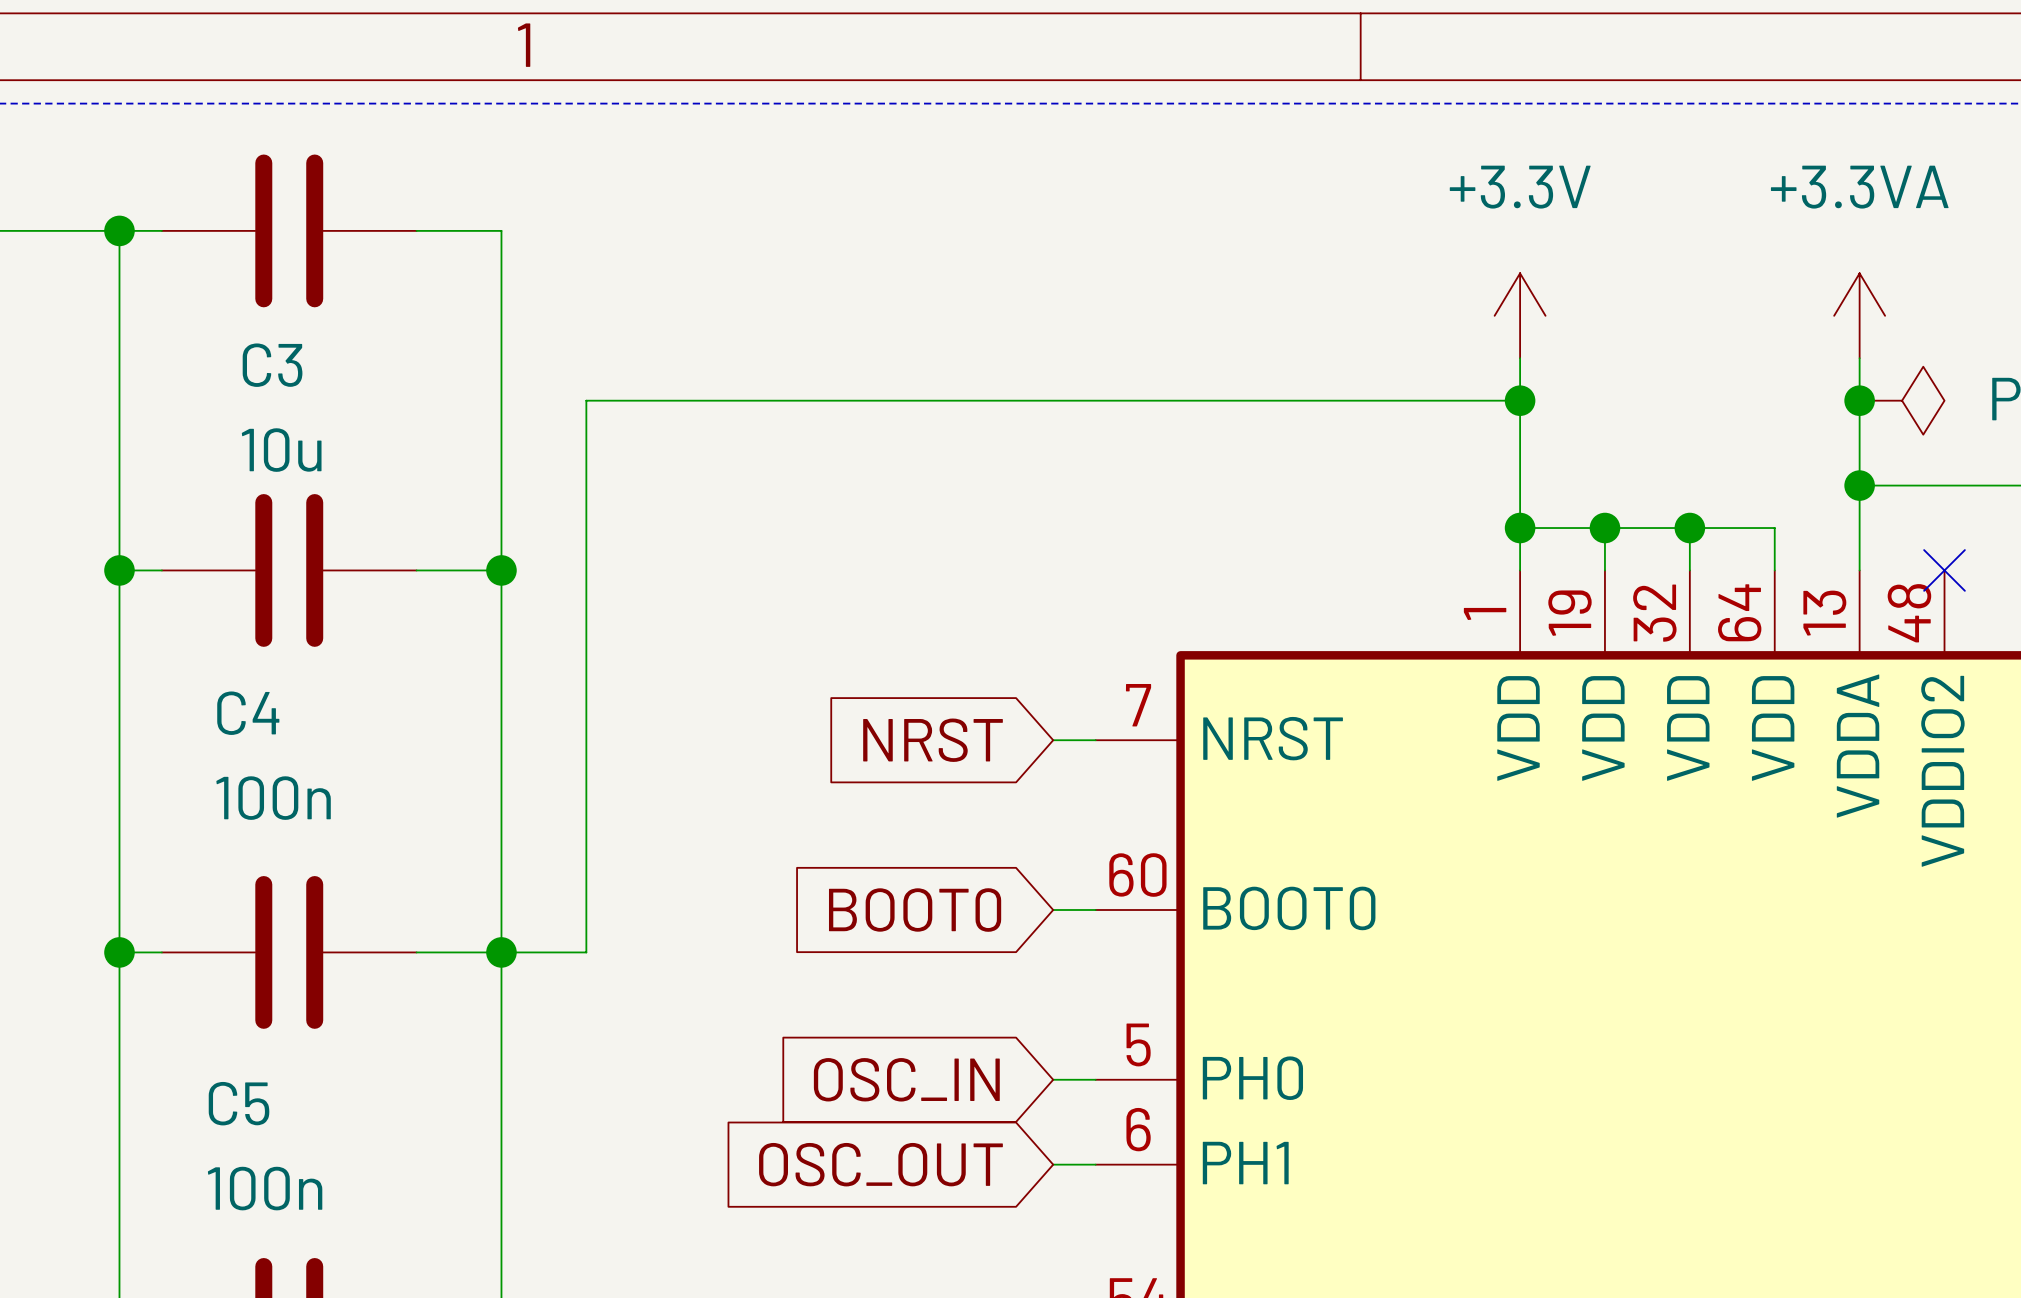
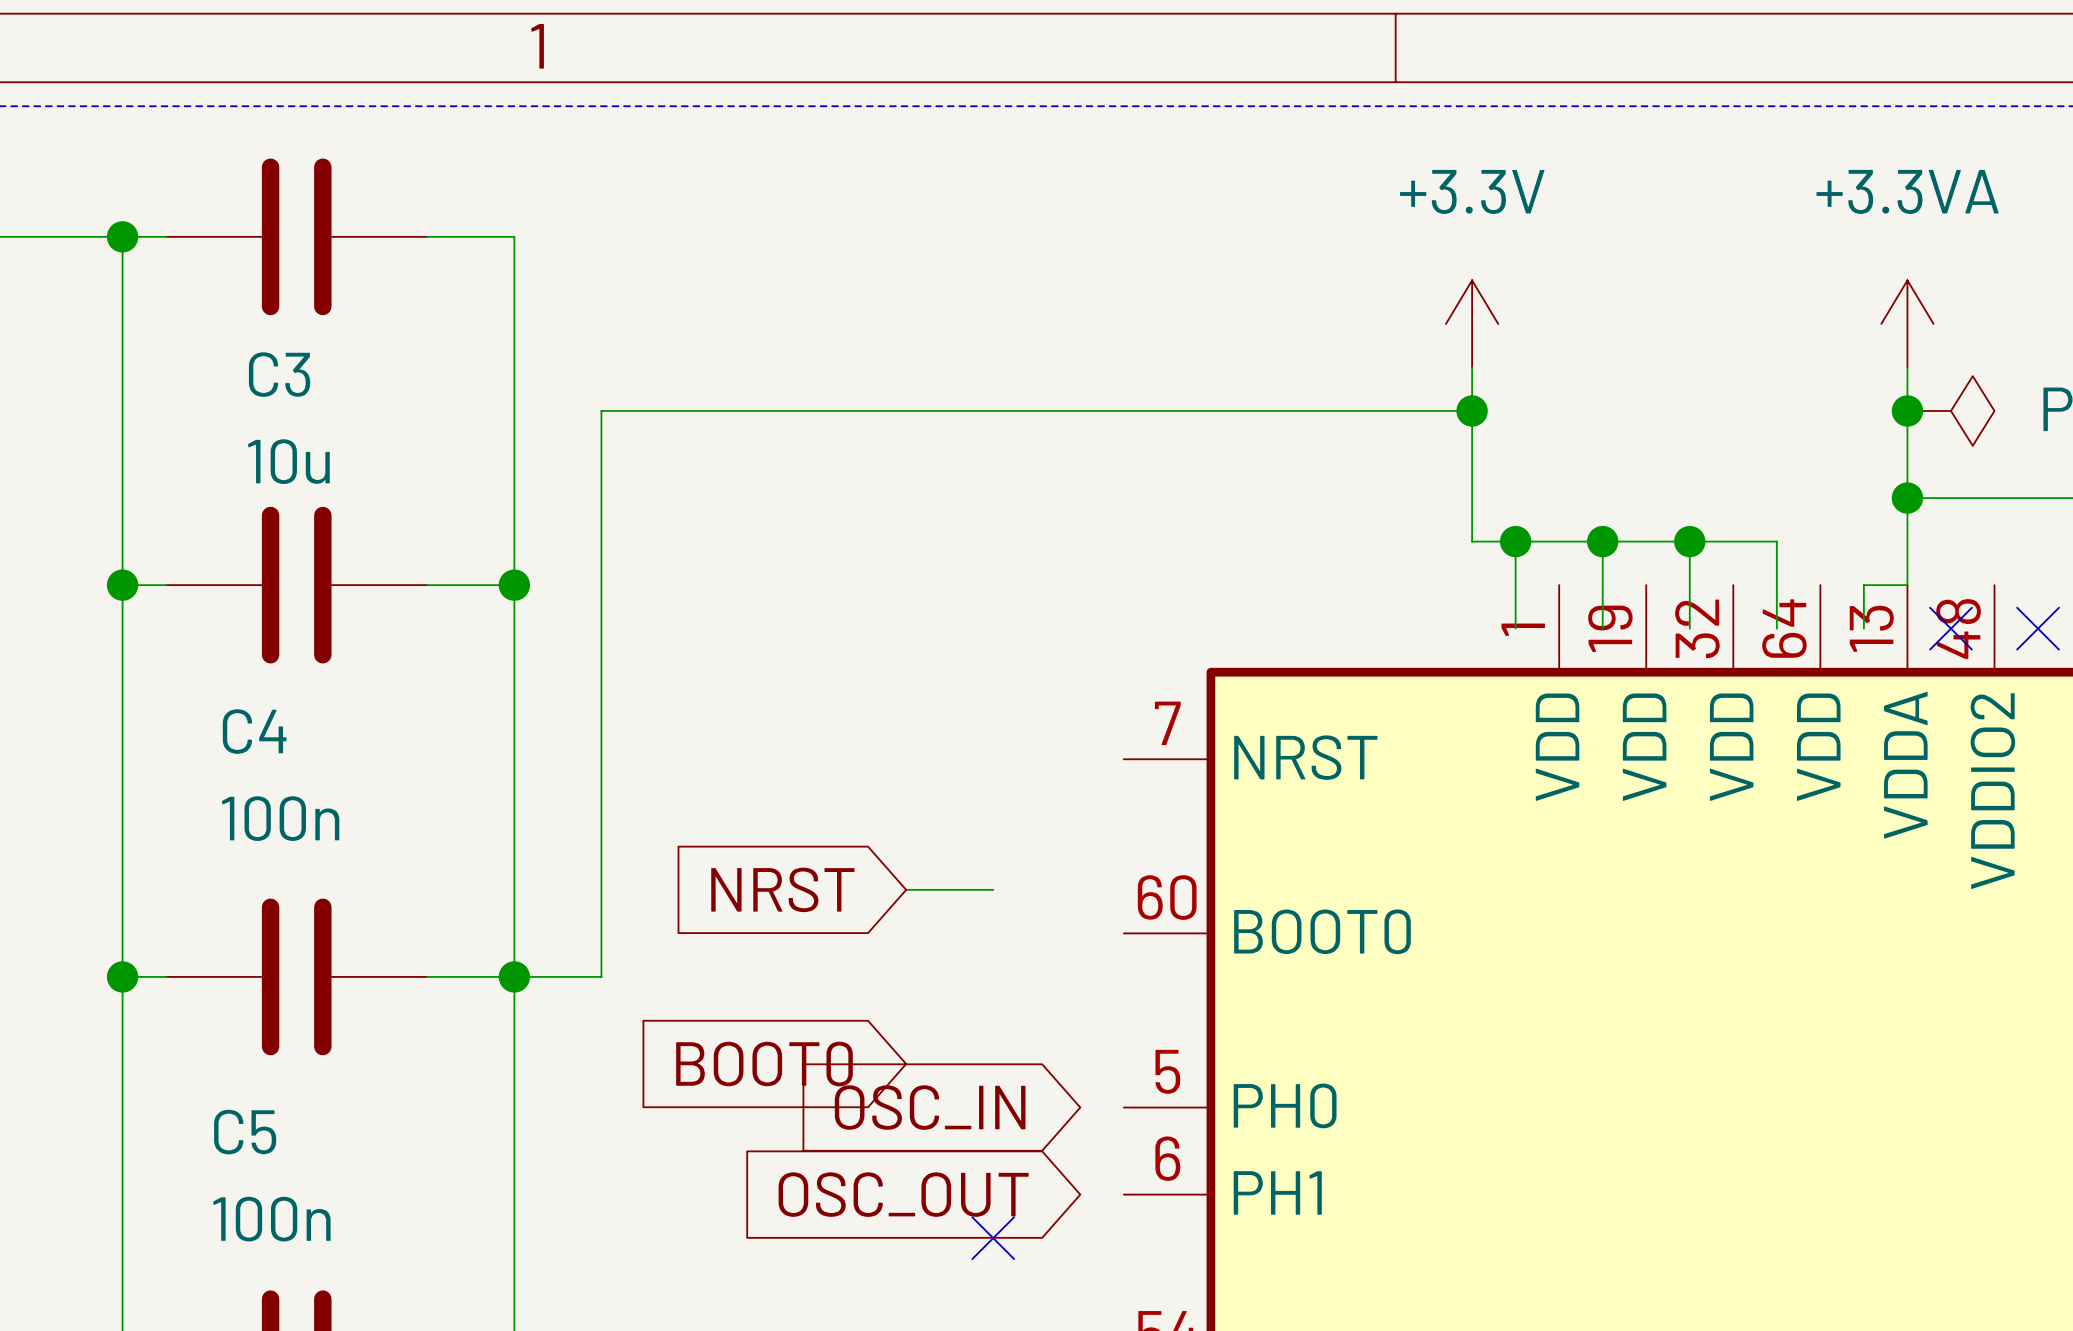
power symbol position: +3.3V (1520, 315) -> +3.3V (1472, 323)
wire: none -> (1472, 367) (1472, 541) (1559, 541)
wire: (1520, 358) (1520, 570) -> none
wire: (1435, 400) (1520, 400) -> (906, 889) (993, 889)
junction: none -> (1472, 410)
junction: (1520, 400) -> none
wire: none -> (1515, 541) (1515, 628)
junction: none -> (1515, 541)
junction: (1520, 528) -> none
wire: none -> (1602, 541) (1602, 628)
junction: none -> (1602, 541)
wire: (1604, 528) (1604, 570) -> none
junction: (1604, 528) -> none
wire: none -> (1689, 541) (1689, 628)
junction: none -> (1689, 541)
wire: (1689, 528) (1689, 570) -> none
junction: (1689, 528) -> none
wire: (1732, 528) (1774, 528) (1774, 570) -> (1776, 541) (1776, 628)
wire: none -> (1907, 585) (1863, 585) (1863, 628)
no-connect mark: (1944, 570) -> none
no-connect mark: none -> (1950, 628)
no-connect mark: none -> (2038, 628)
global label position: NRST (933, 740) -> NRST (782, 889)
wire: (1053, 740) (1095, 740) -> none
wire: (1053, 909) (1095, 909) -> none
global label position: BOOT0 (915, 910) -> BOOT0 (764, 1064)
wire: (1053, 1079) (1095, 1079) -> none
wire: (1053, 1164) (1095, 1164) -> none
no-connect mark: none -> (993, 1238)

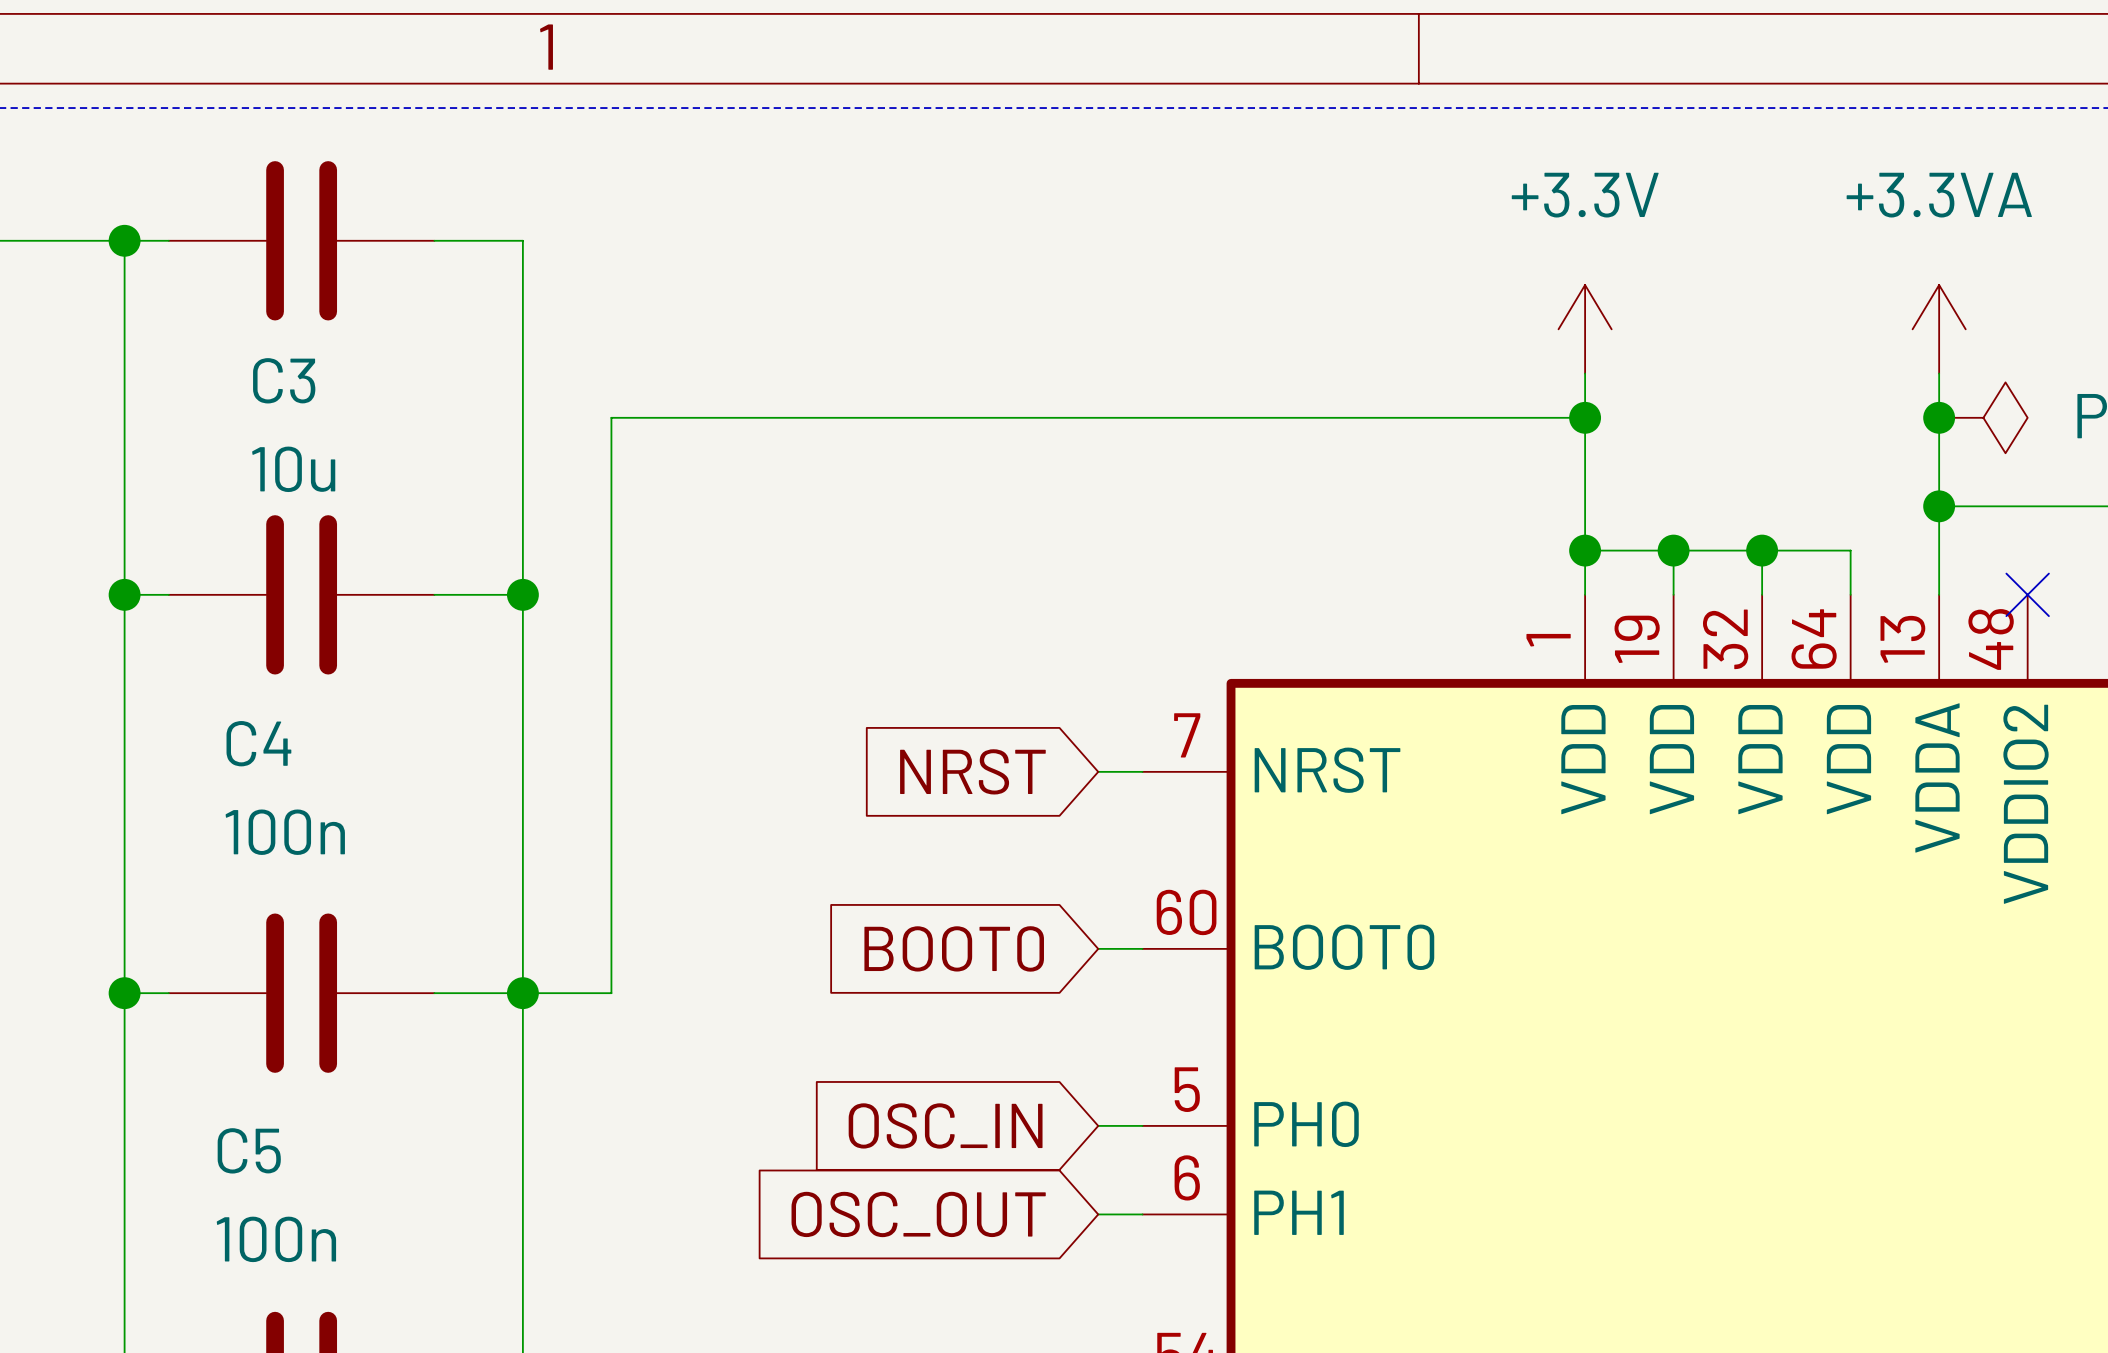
power symbol position: +3.3V (1472, 323) -> +3.3V (1585, 329)
wire: (1472, 367) (1472, 541) (1559, 541) -> none
wire: none -> (1585, 373) (1585, 594)
junction: (1472, 410) -> none
junction: none -> (1585, 417)
wire: (1515, 541) (1515, 628) -> none
junction: (1515, 541) -> none
junction: none -> (1585, 550)
wire: (1602, 541) (1602, 628) -> none
junction: (1602, 541) -> none
wire: none -> (1673, 550) (1673, 594)
junction: none -> (1673, 550)
wire: (1689, 541) (1689, 628) -> none
junction: (1689, 541) -> none
wire: none -> (1762, 550) (1762, 594)
junction: none -> (1762, 550)
wire: (1776, 541) (1776, 628) -> (1806, 550) (1850, 550) (1850, 594)
wire: (1907, 585) (1863, 585) (1863, 628) -> none
no-connect mark: none -> (2027, 594)
no-connect mark: (1950, 628) -> none
no-connect mark: (2038, 628) -> none
wire: none -> (1098, 771) (1142, 771)
global label position: NRST (782, 889) -> NRST (972, 771)
wire: (906, 889) (993, 889) -> (1496, 417) (1585, 417)
wire: none -> (1098, 948) (1142, 948)
global label position: BOOT0 (764, 1064) -> BOOT0 (954, 948)
wire: none -> (1098, 1125) (1142, 1125)
wire: none -> (1098, 1214) (1142, 1214)
no-connect mark: (993, 1238) -> none

